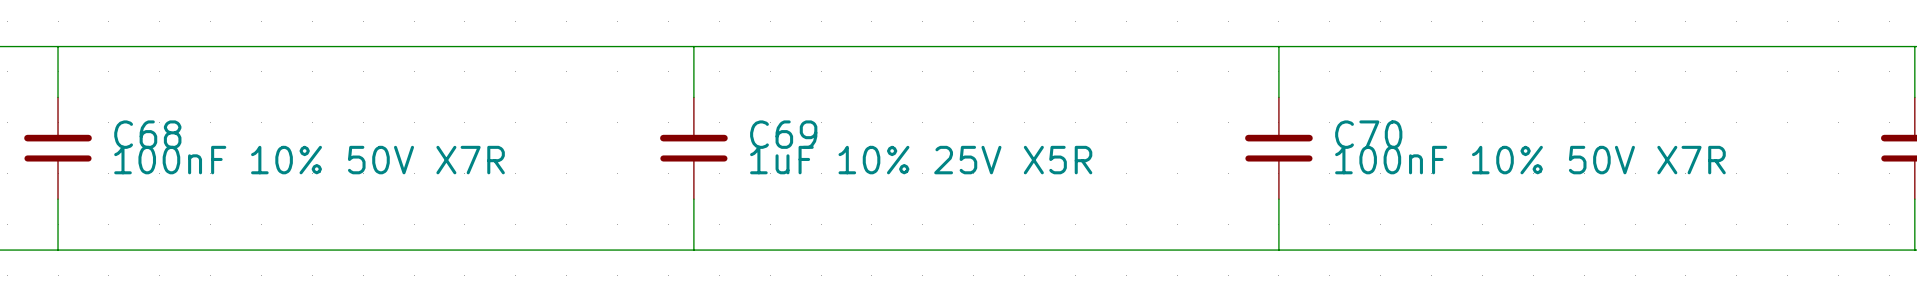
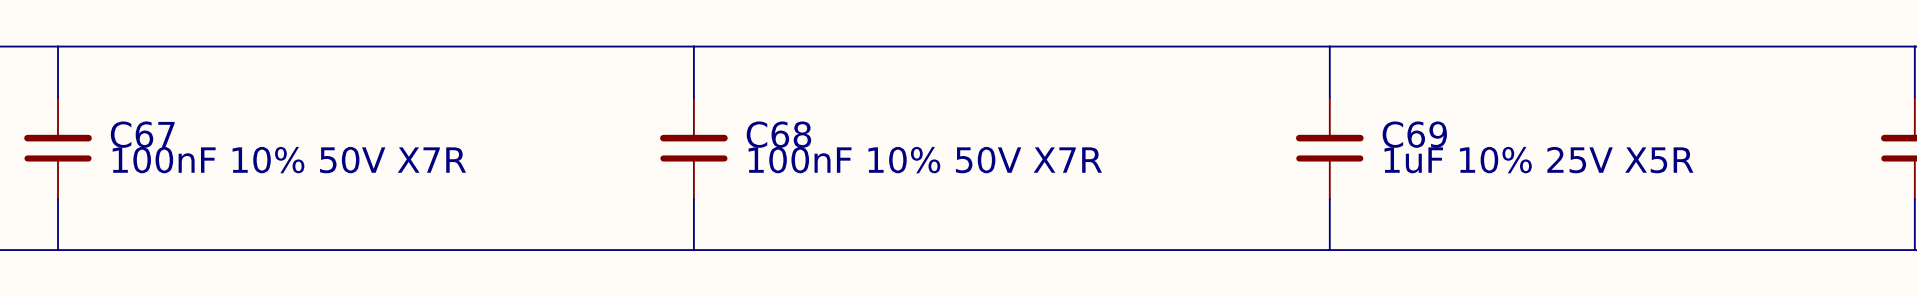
wire: (1278, 46) (1278, 97) -> (1329, 46) (1329, 97)
C68 name: C68 (147, 134) -> C67 (142, 134)
C69 name: C69 (783, 134) -> C68 (778, 134)
C70: 100nF 10% 50V X7R (1278, 148) -> none
C69: none -> 1uF 10% 25V X5R (1329, 148)
C69 value: 1uF 10% 25V X5R (921, 160) -> 100nF 10% 50V X7R (925, 160)
wire: (1278, 199) (1278, 250) -> (1329, 199) (1329, 250)

